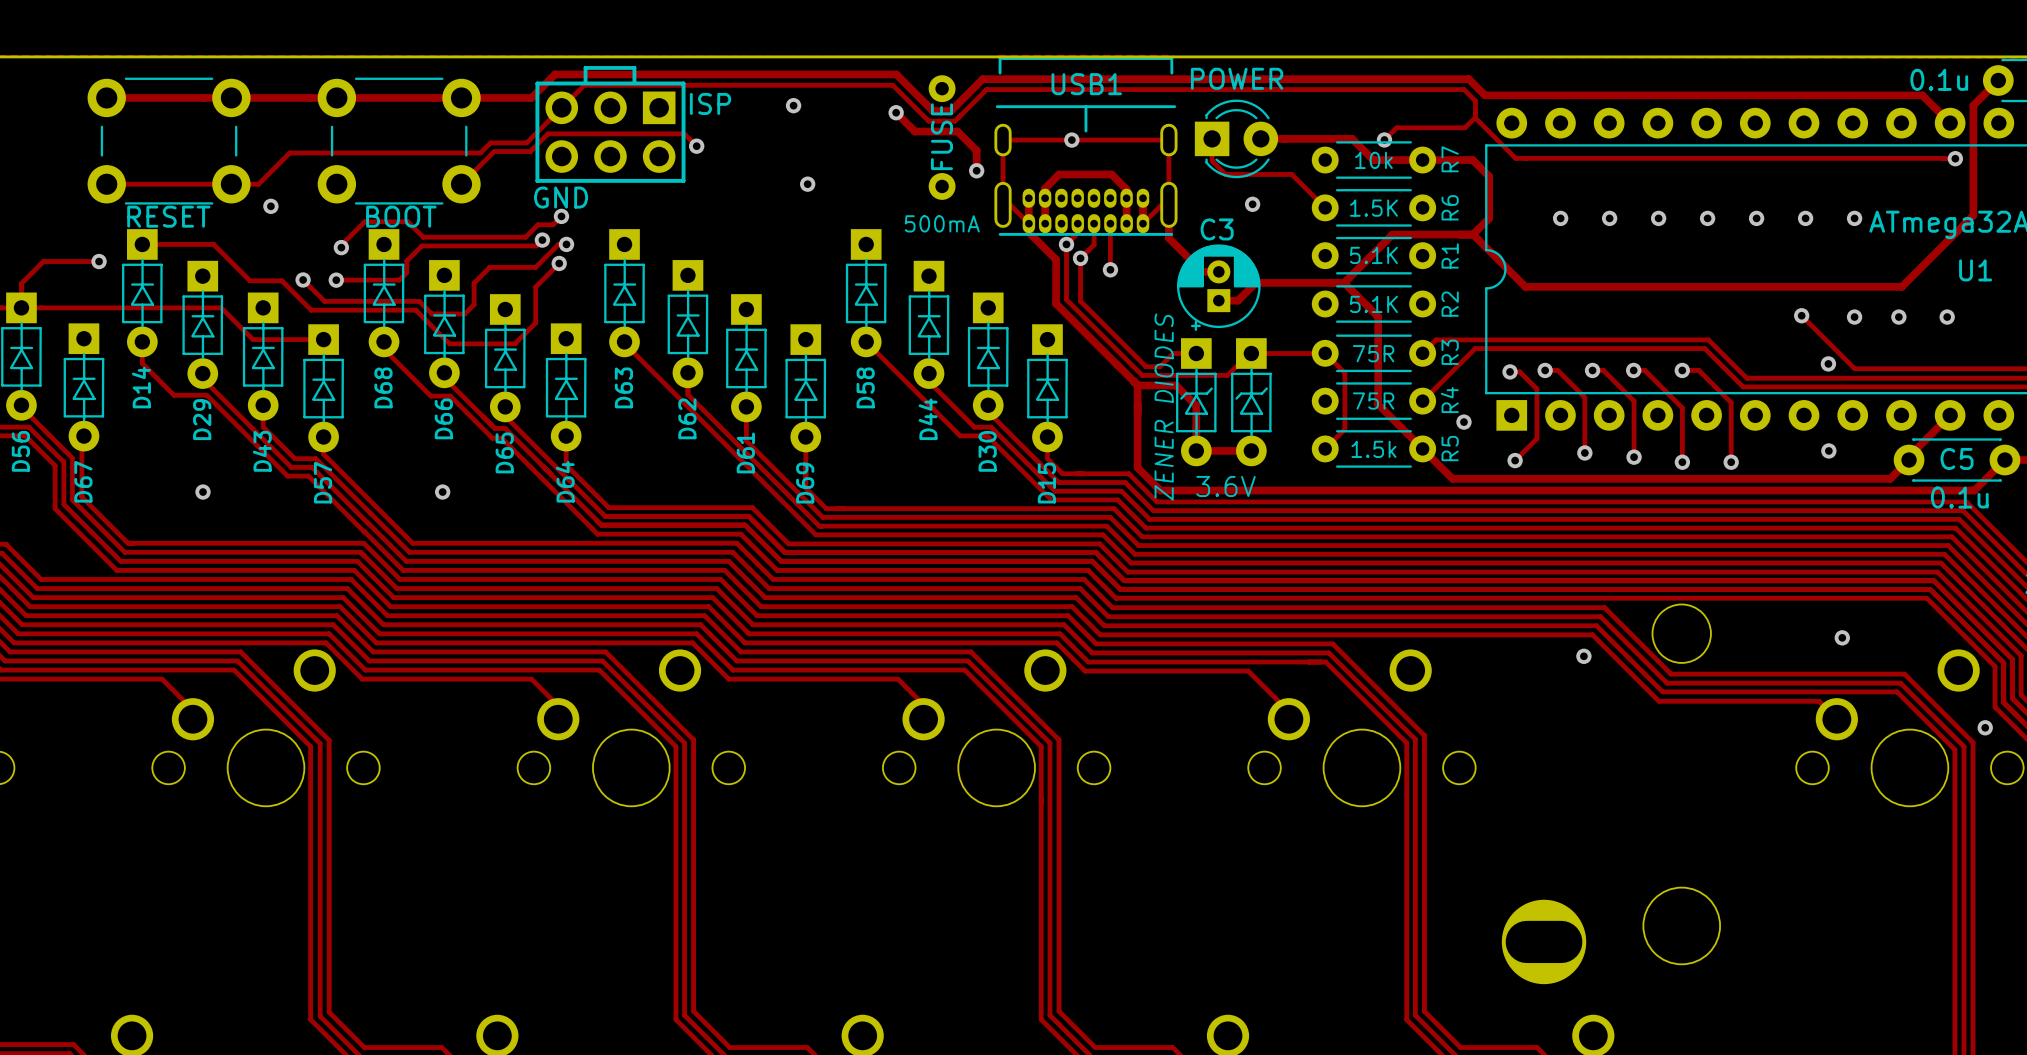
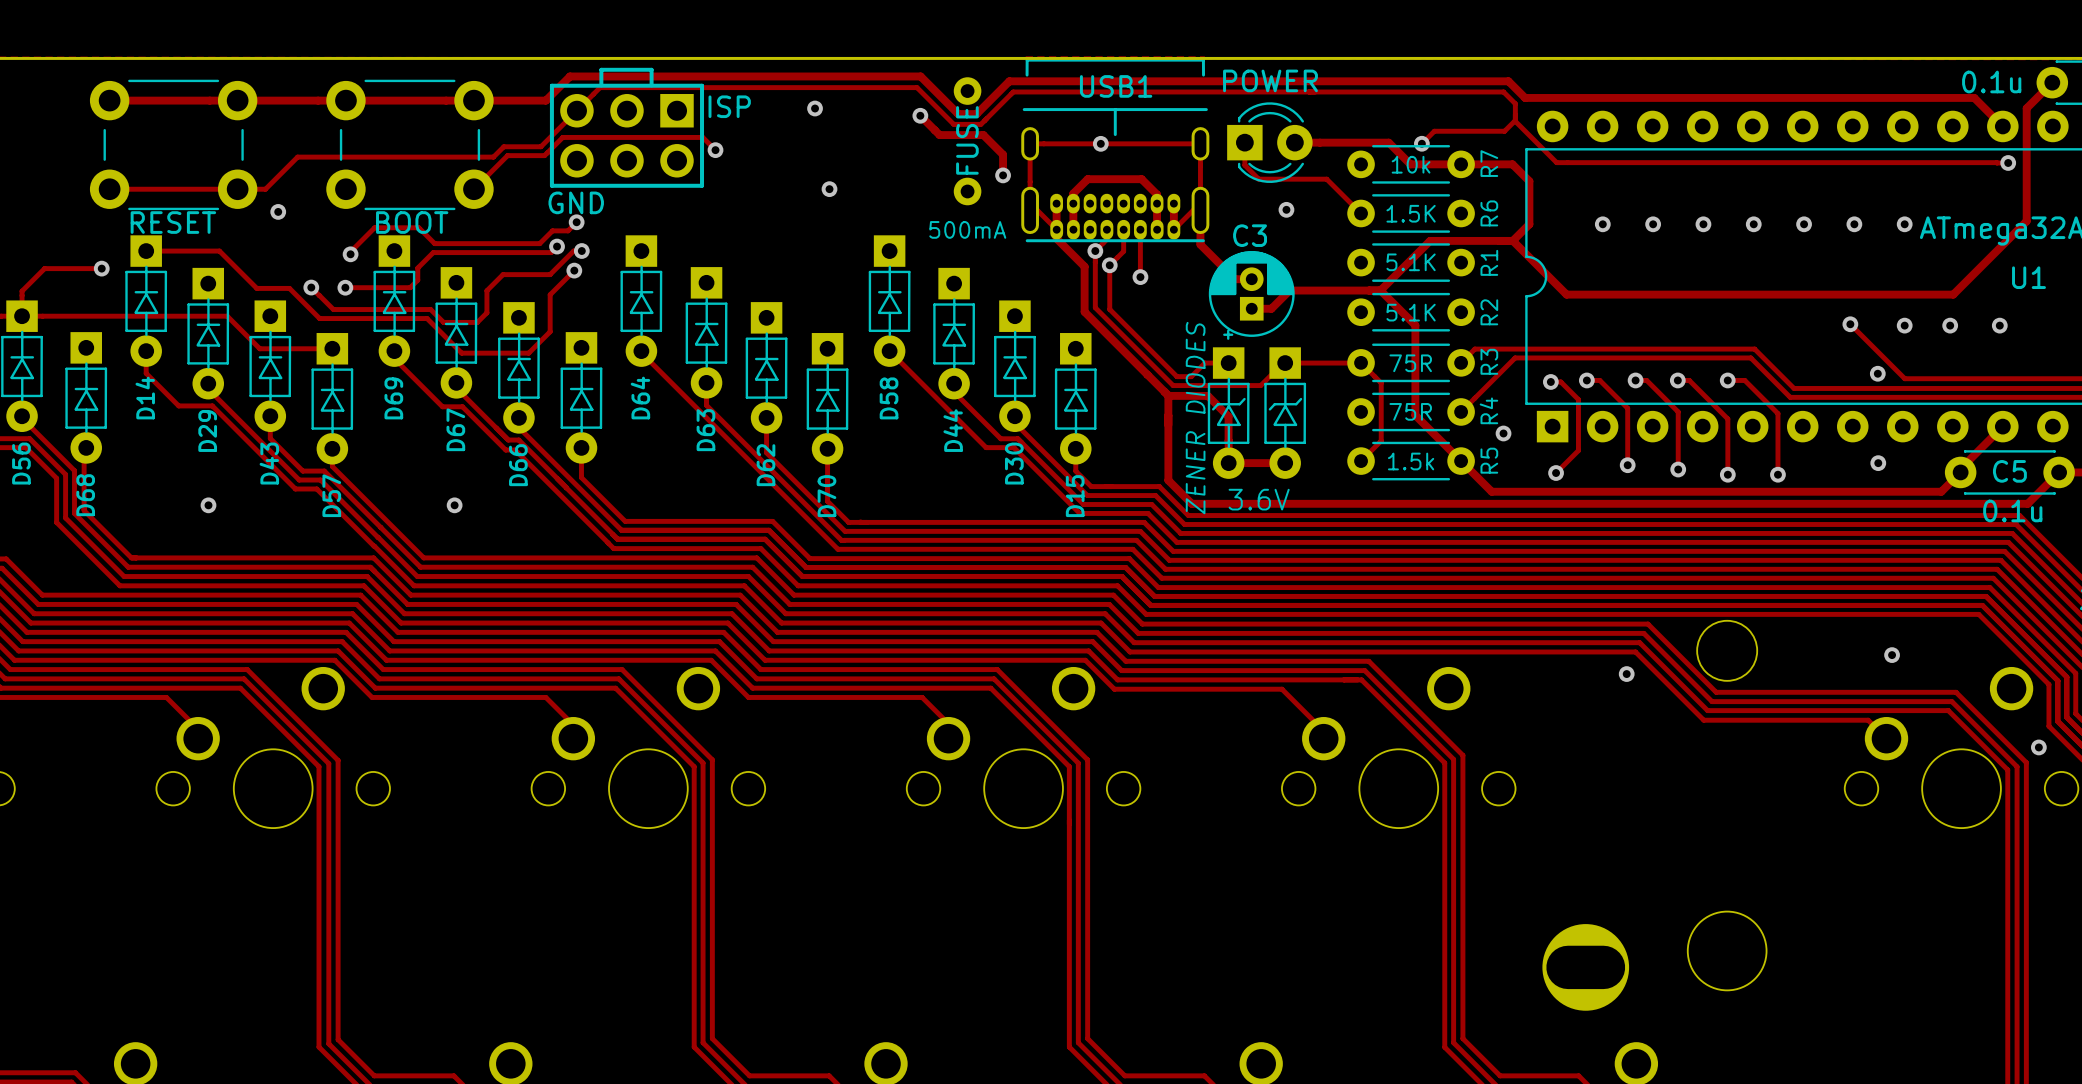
D68 name: D68 (383, 387) -> D69 (393, 398)
D63 name: D63 (623, 387) -> D64 (640, 398)
D66 name: D66 (443, 418) -> D67 (455, 429)
D62 name: D62 (687, 418) -> D63 (705, 430)
D65 name: D65 (504, 452) -> D66 (518, 465)
D61 name: D61 (745, 452) -> D62 (765, 465)
D67 name: D67 (83, 481) -> D68 (85, 495)
D64 name: D64 (565, 481) -> none
D69 name: D69 (805, 483) -> D70 (826, 496)

